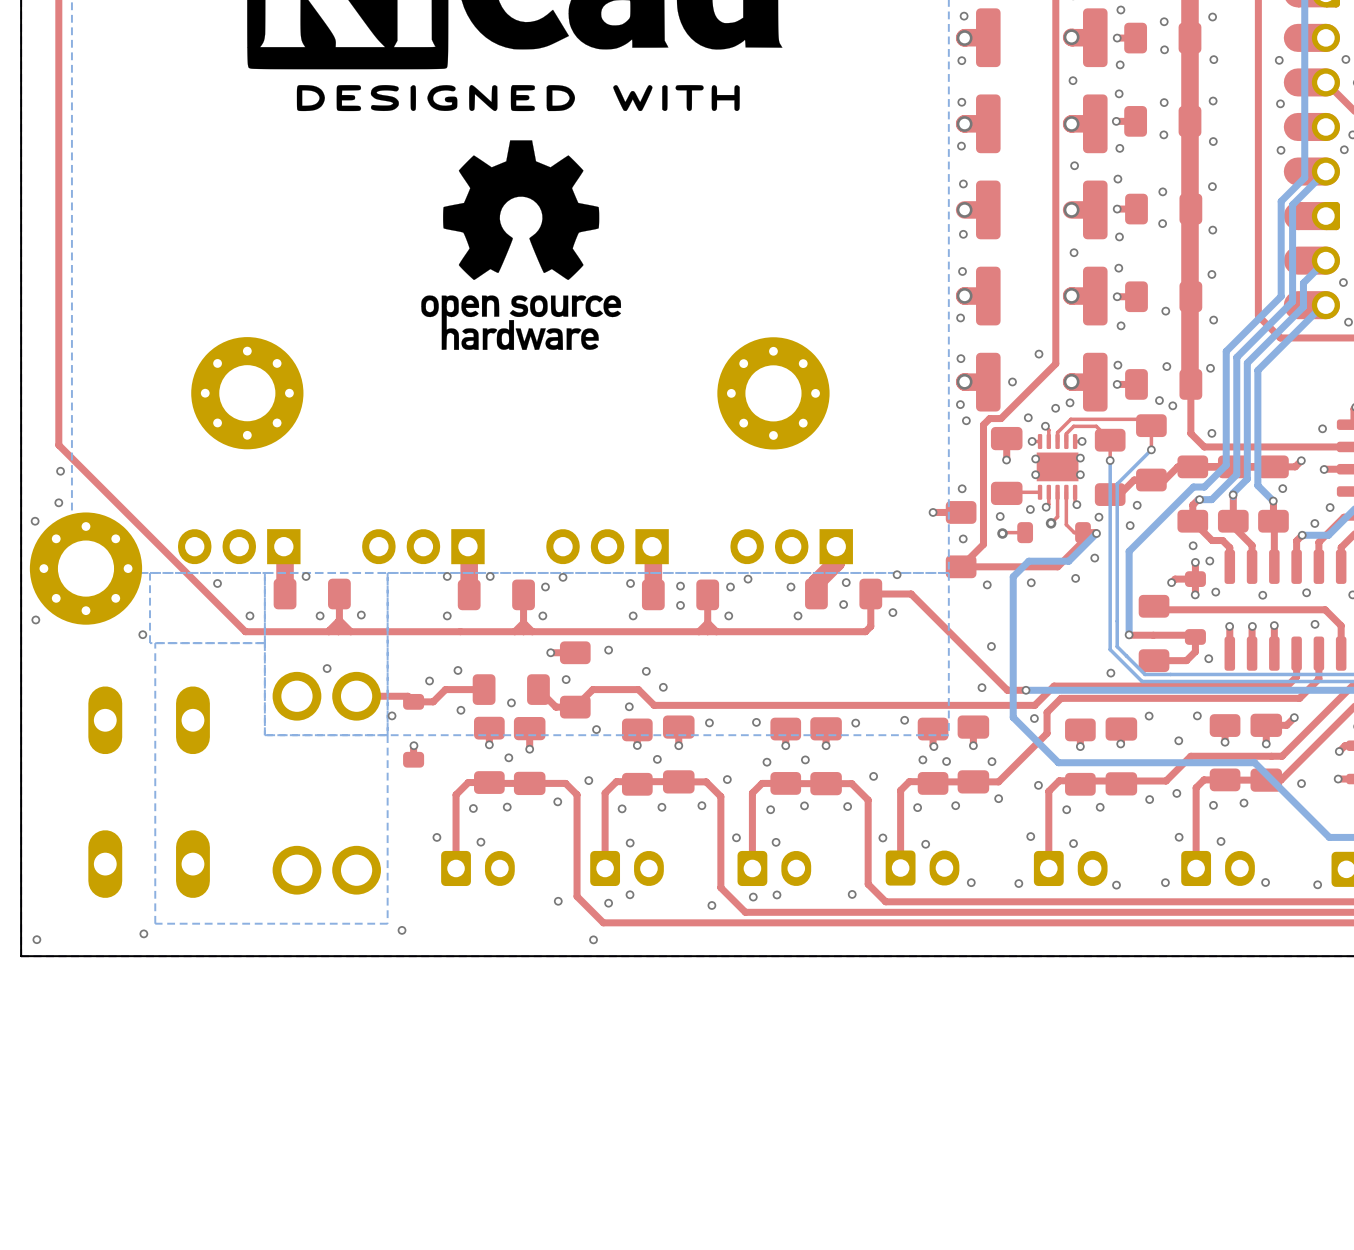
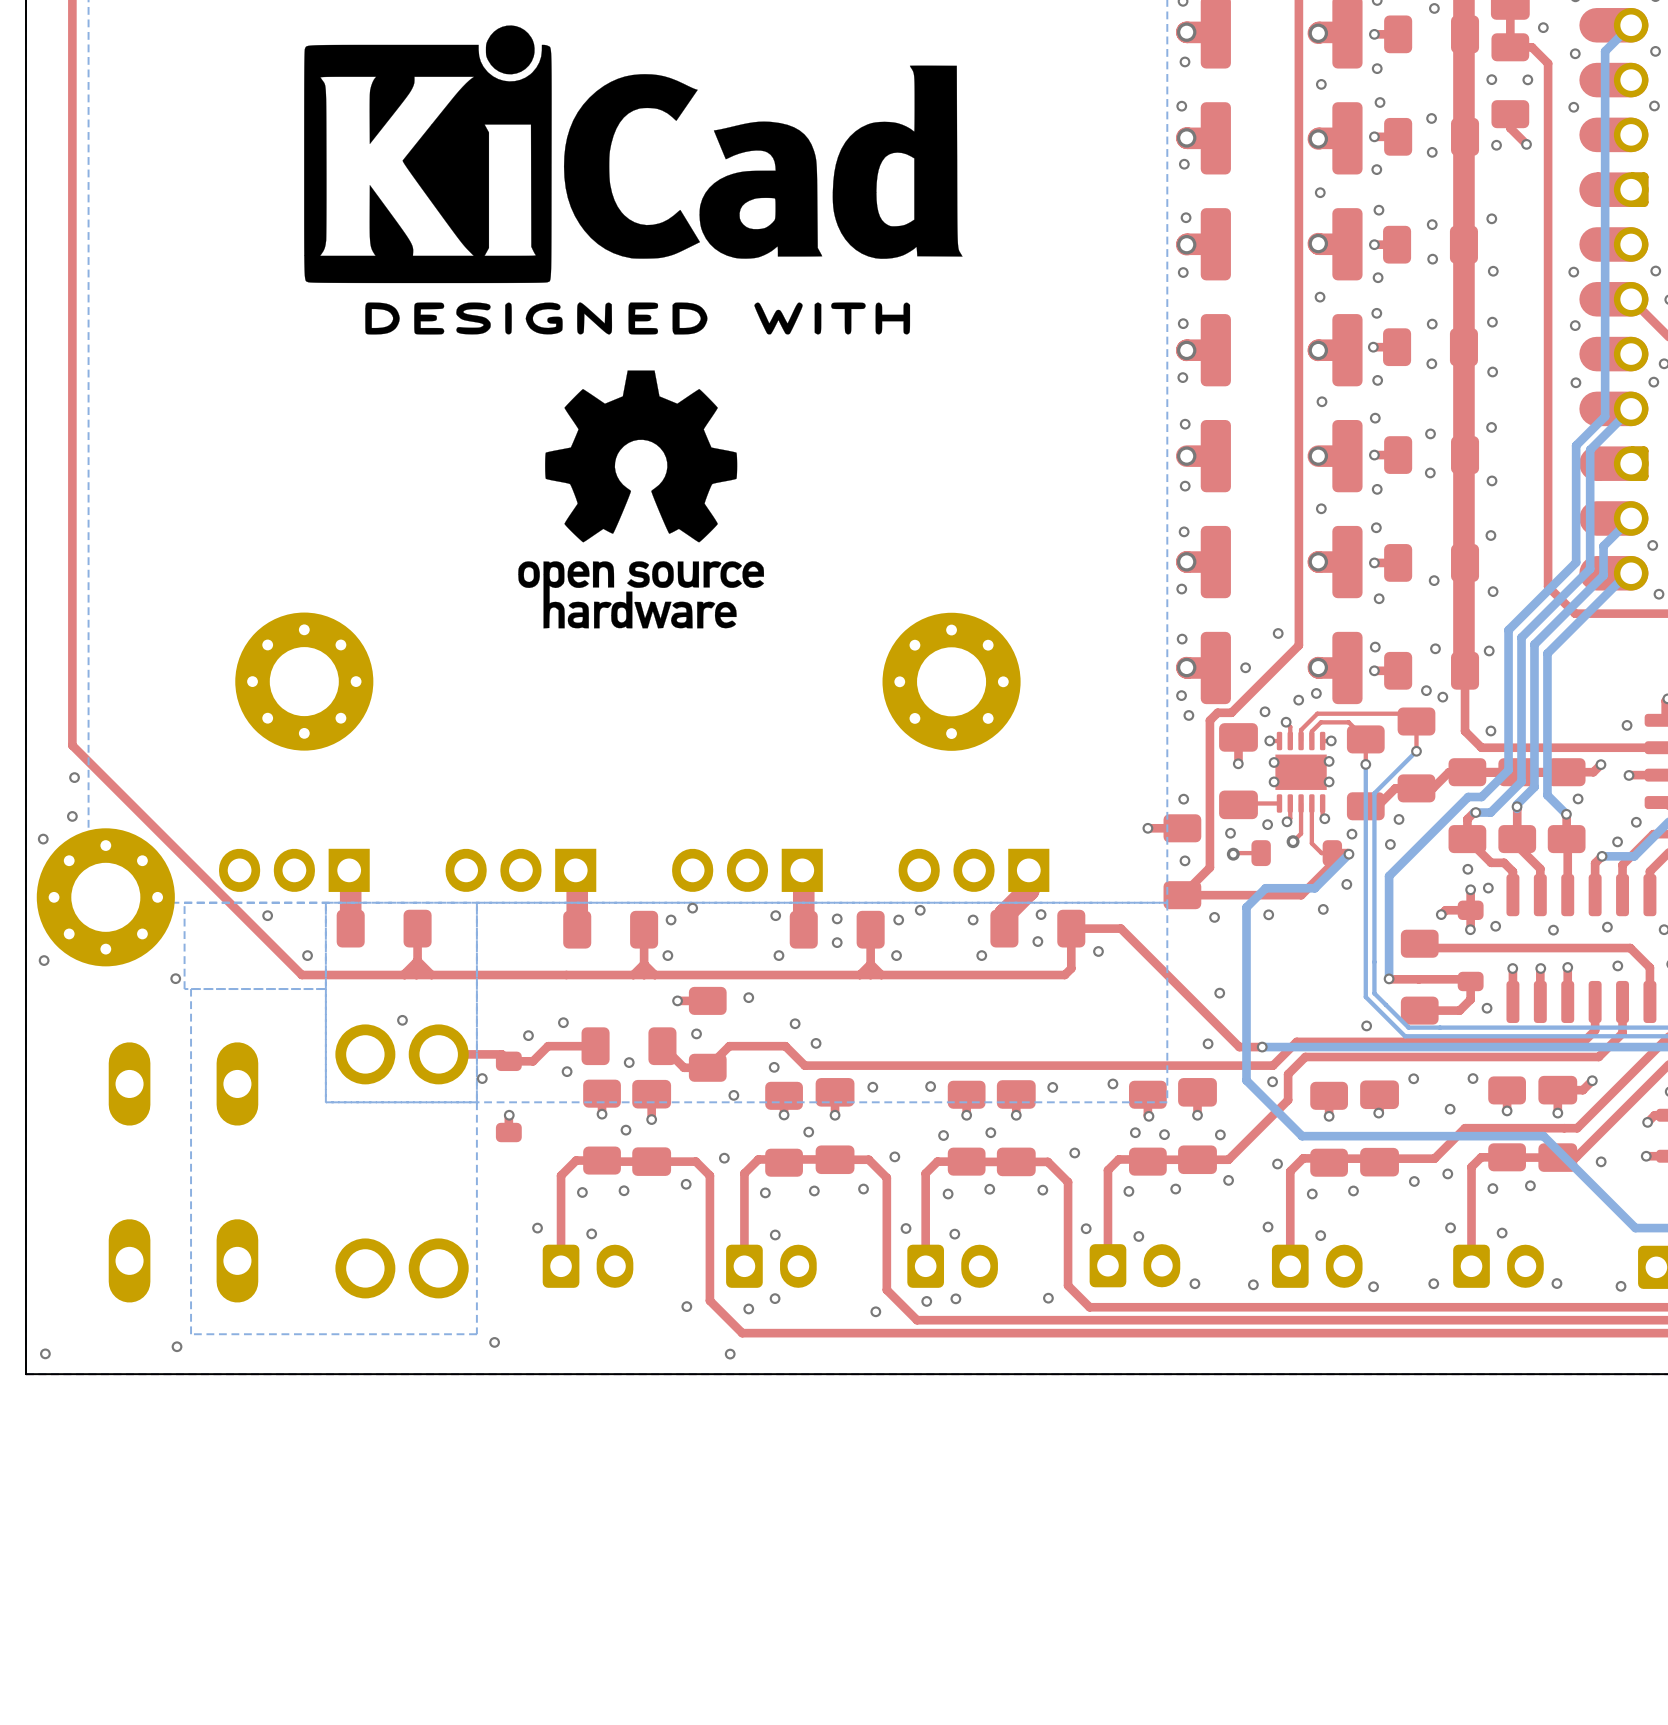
via: (897, 574) -> none
via: (306, 576) -> none
via: (447, 576) -> none
via: (490, 576) -> none
via: (320, 615) -> none
via: (361, 615) -> none
via: (447, 615) -> none

